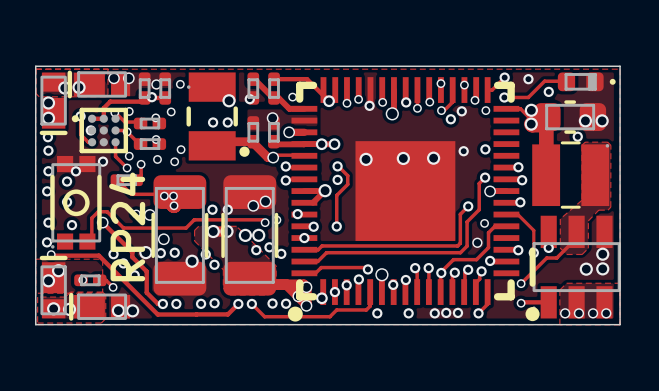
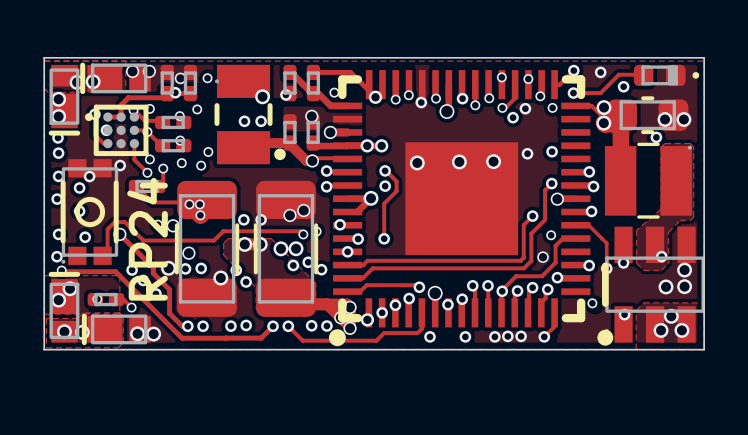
track: (576, 231) (576, 238) (556, 258) (546, 258) (521, 283) -> none
via: none -> (661, 256)
via: none -> (624, 314)
via: none -> (671, 316)
track: (548, 302) (521, 303) -> none
via: (521, 303) -> none
via: none -> (661, 330)
via: none -> (681, 330)
via: (565, 313) -> none
via: (578, 313) -> none
via: (593, 313) -> none
via: (606, 313) -> none

